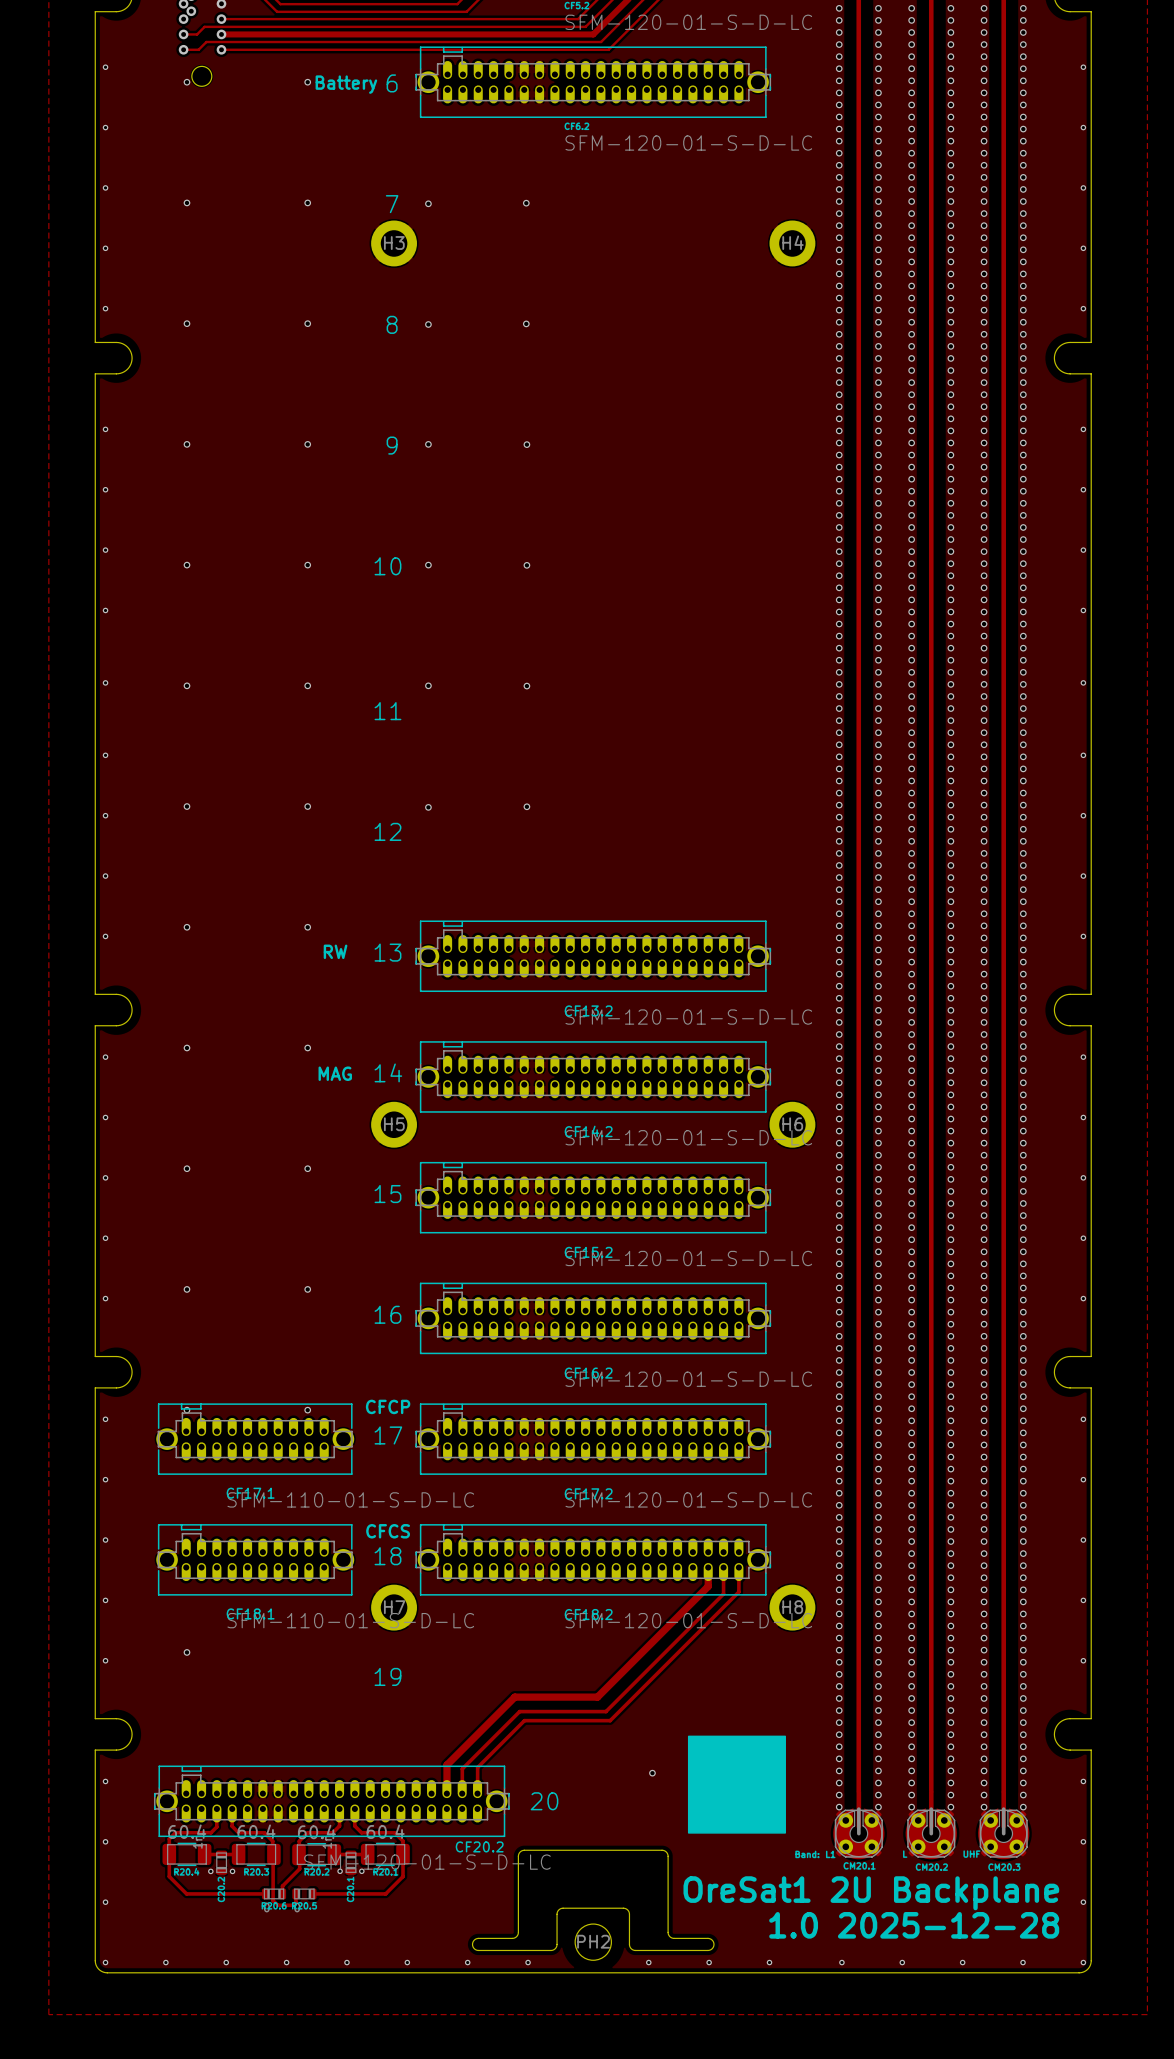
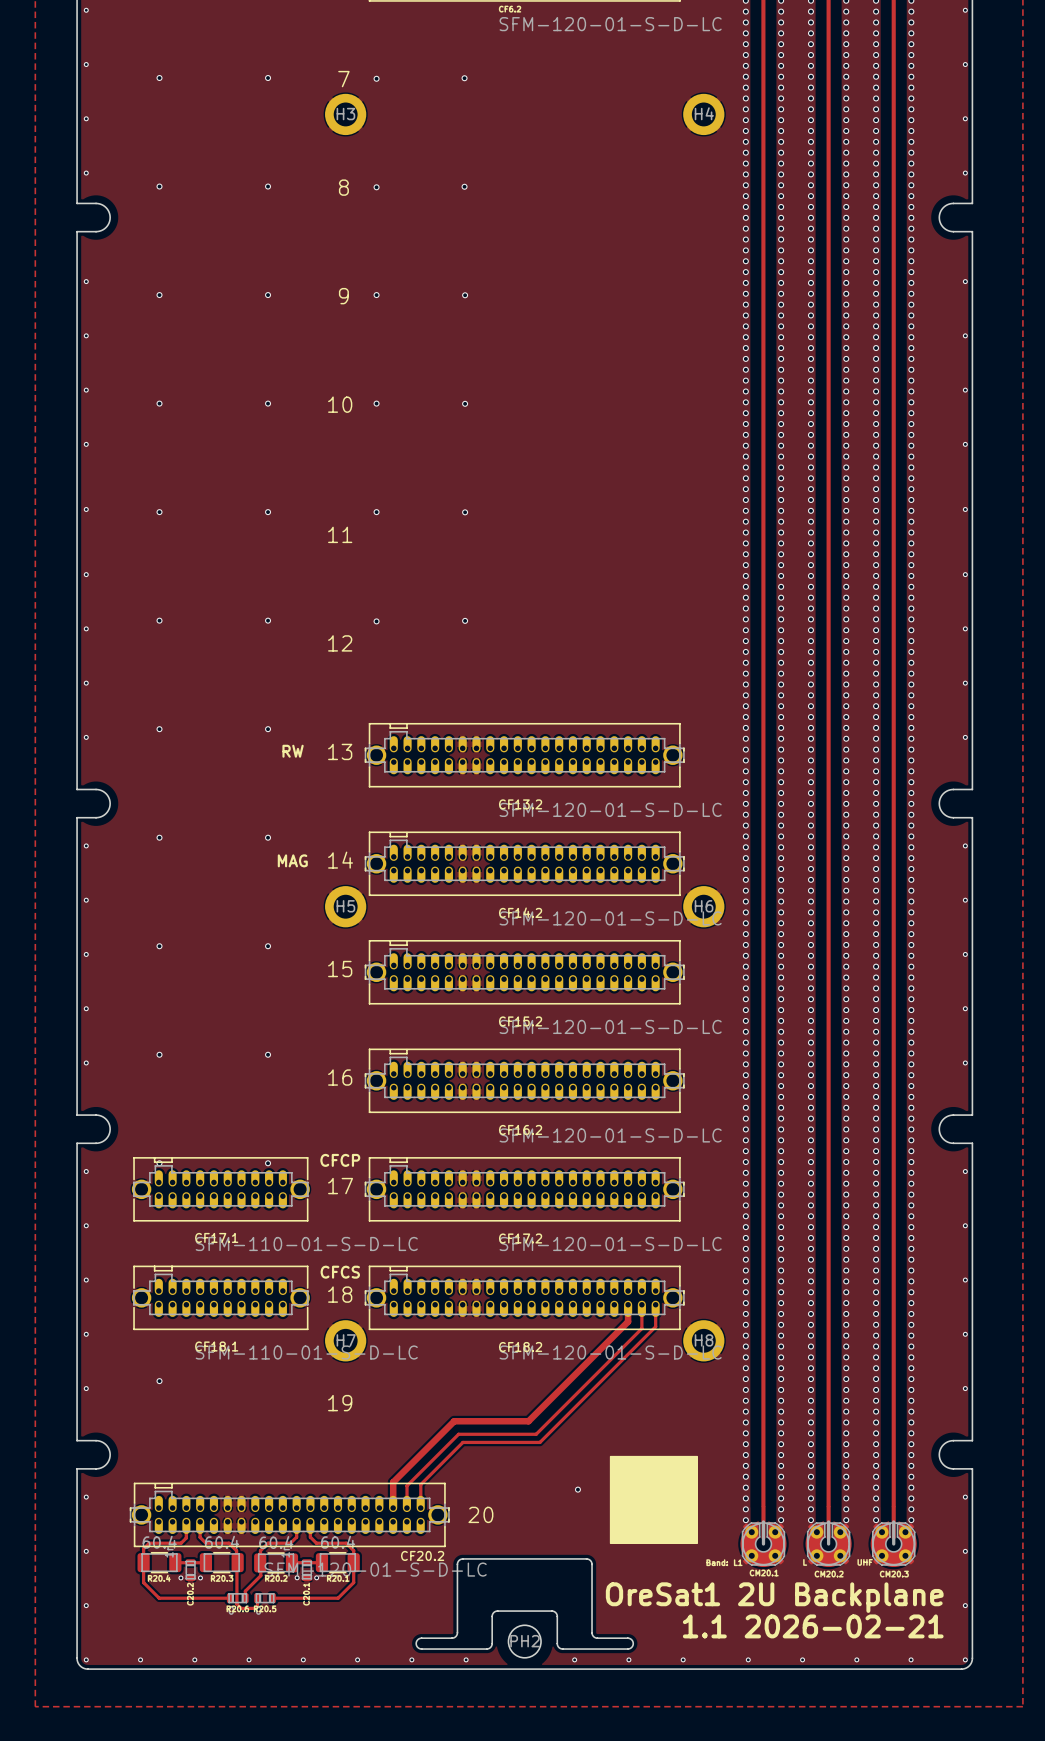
text: 1.0 2025-12-28 (914, 1925) -> 1.1 2026-02-21 (813, 1626)

